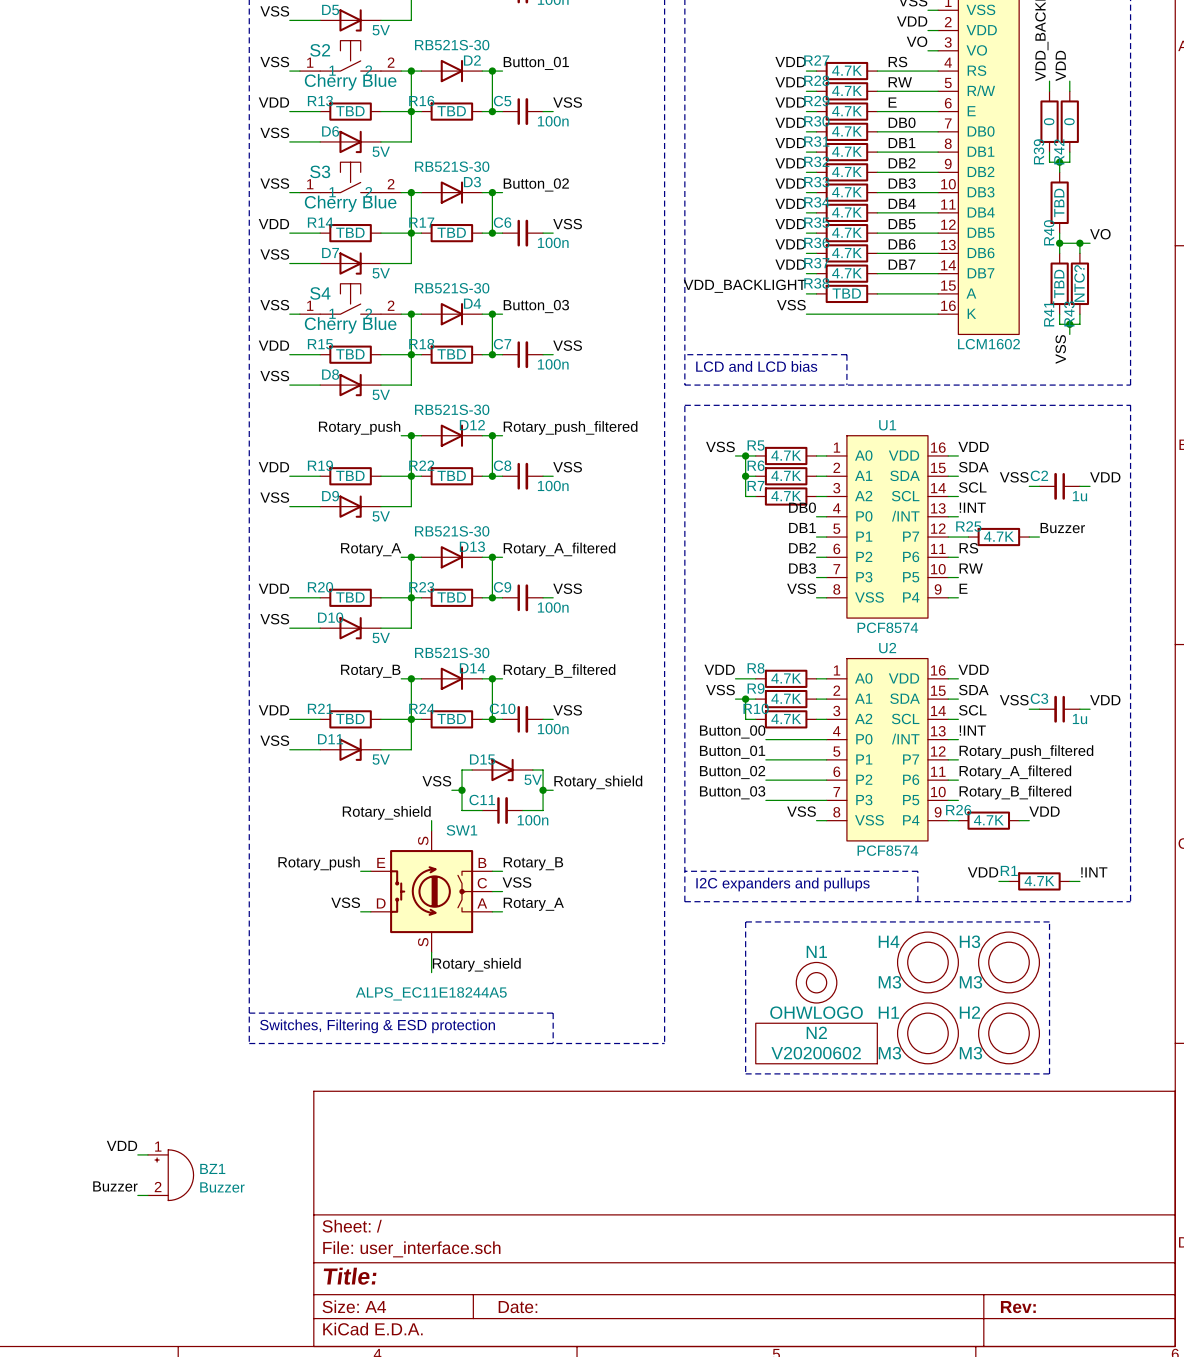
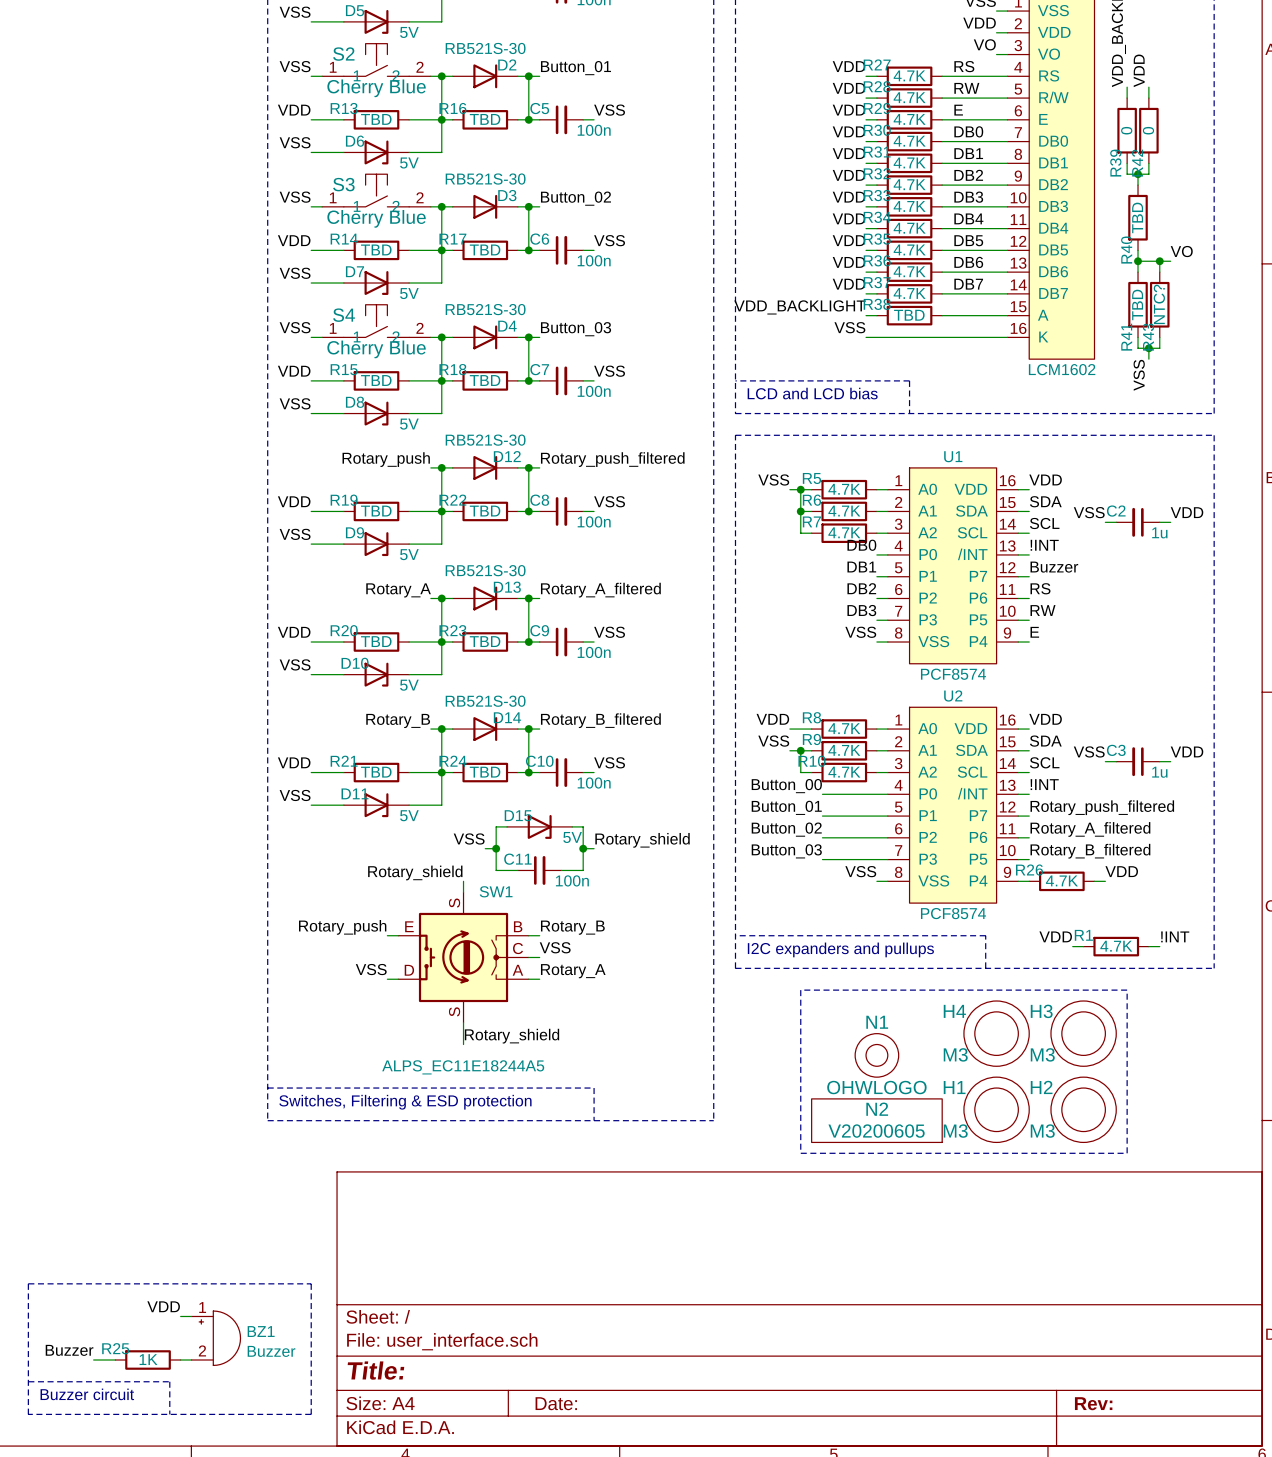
label position: Buzzer (1062, 528) -> Buzzer (1054, 567)
R25 value: 4.7K (998, 536) -> 1K (148, 1359)
wire: (958, 537) (968, 537) -> none
R25 position: (998, 537) -> (148, 1360)
wire: (1029, 537) (1039, 537) -> none
N2 value: V20200602 (816, 1053) -> V20200605 (876, 1131)
label position: VDD (121, 1145) -> VDD (163, 1306)
wire: (137, 1154) (147, 1154) -> (180, 1316) (191, 1316)
BZ1 position: (170, 1175) -> (216, 1338)
label position: Buzzer (115, 1186) -> Buzzer (69, 1350)
line: none -> (28, 1283) (311, 1283) (311, 1414) (28, 1414) (28, 1283)
wire: (137, 1195) (147, 1195) -> (180, 1360) (191, 1360)
wire: none -> (93, 1360) (115, 1360)
line: none -> (28, 1381) (169, 1381) (169, 1414)
text: none -> Buzzer circuit (87, 1394)

